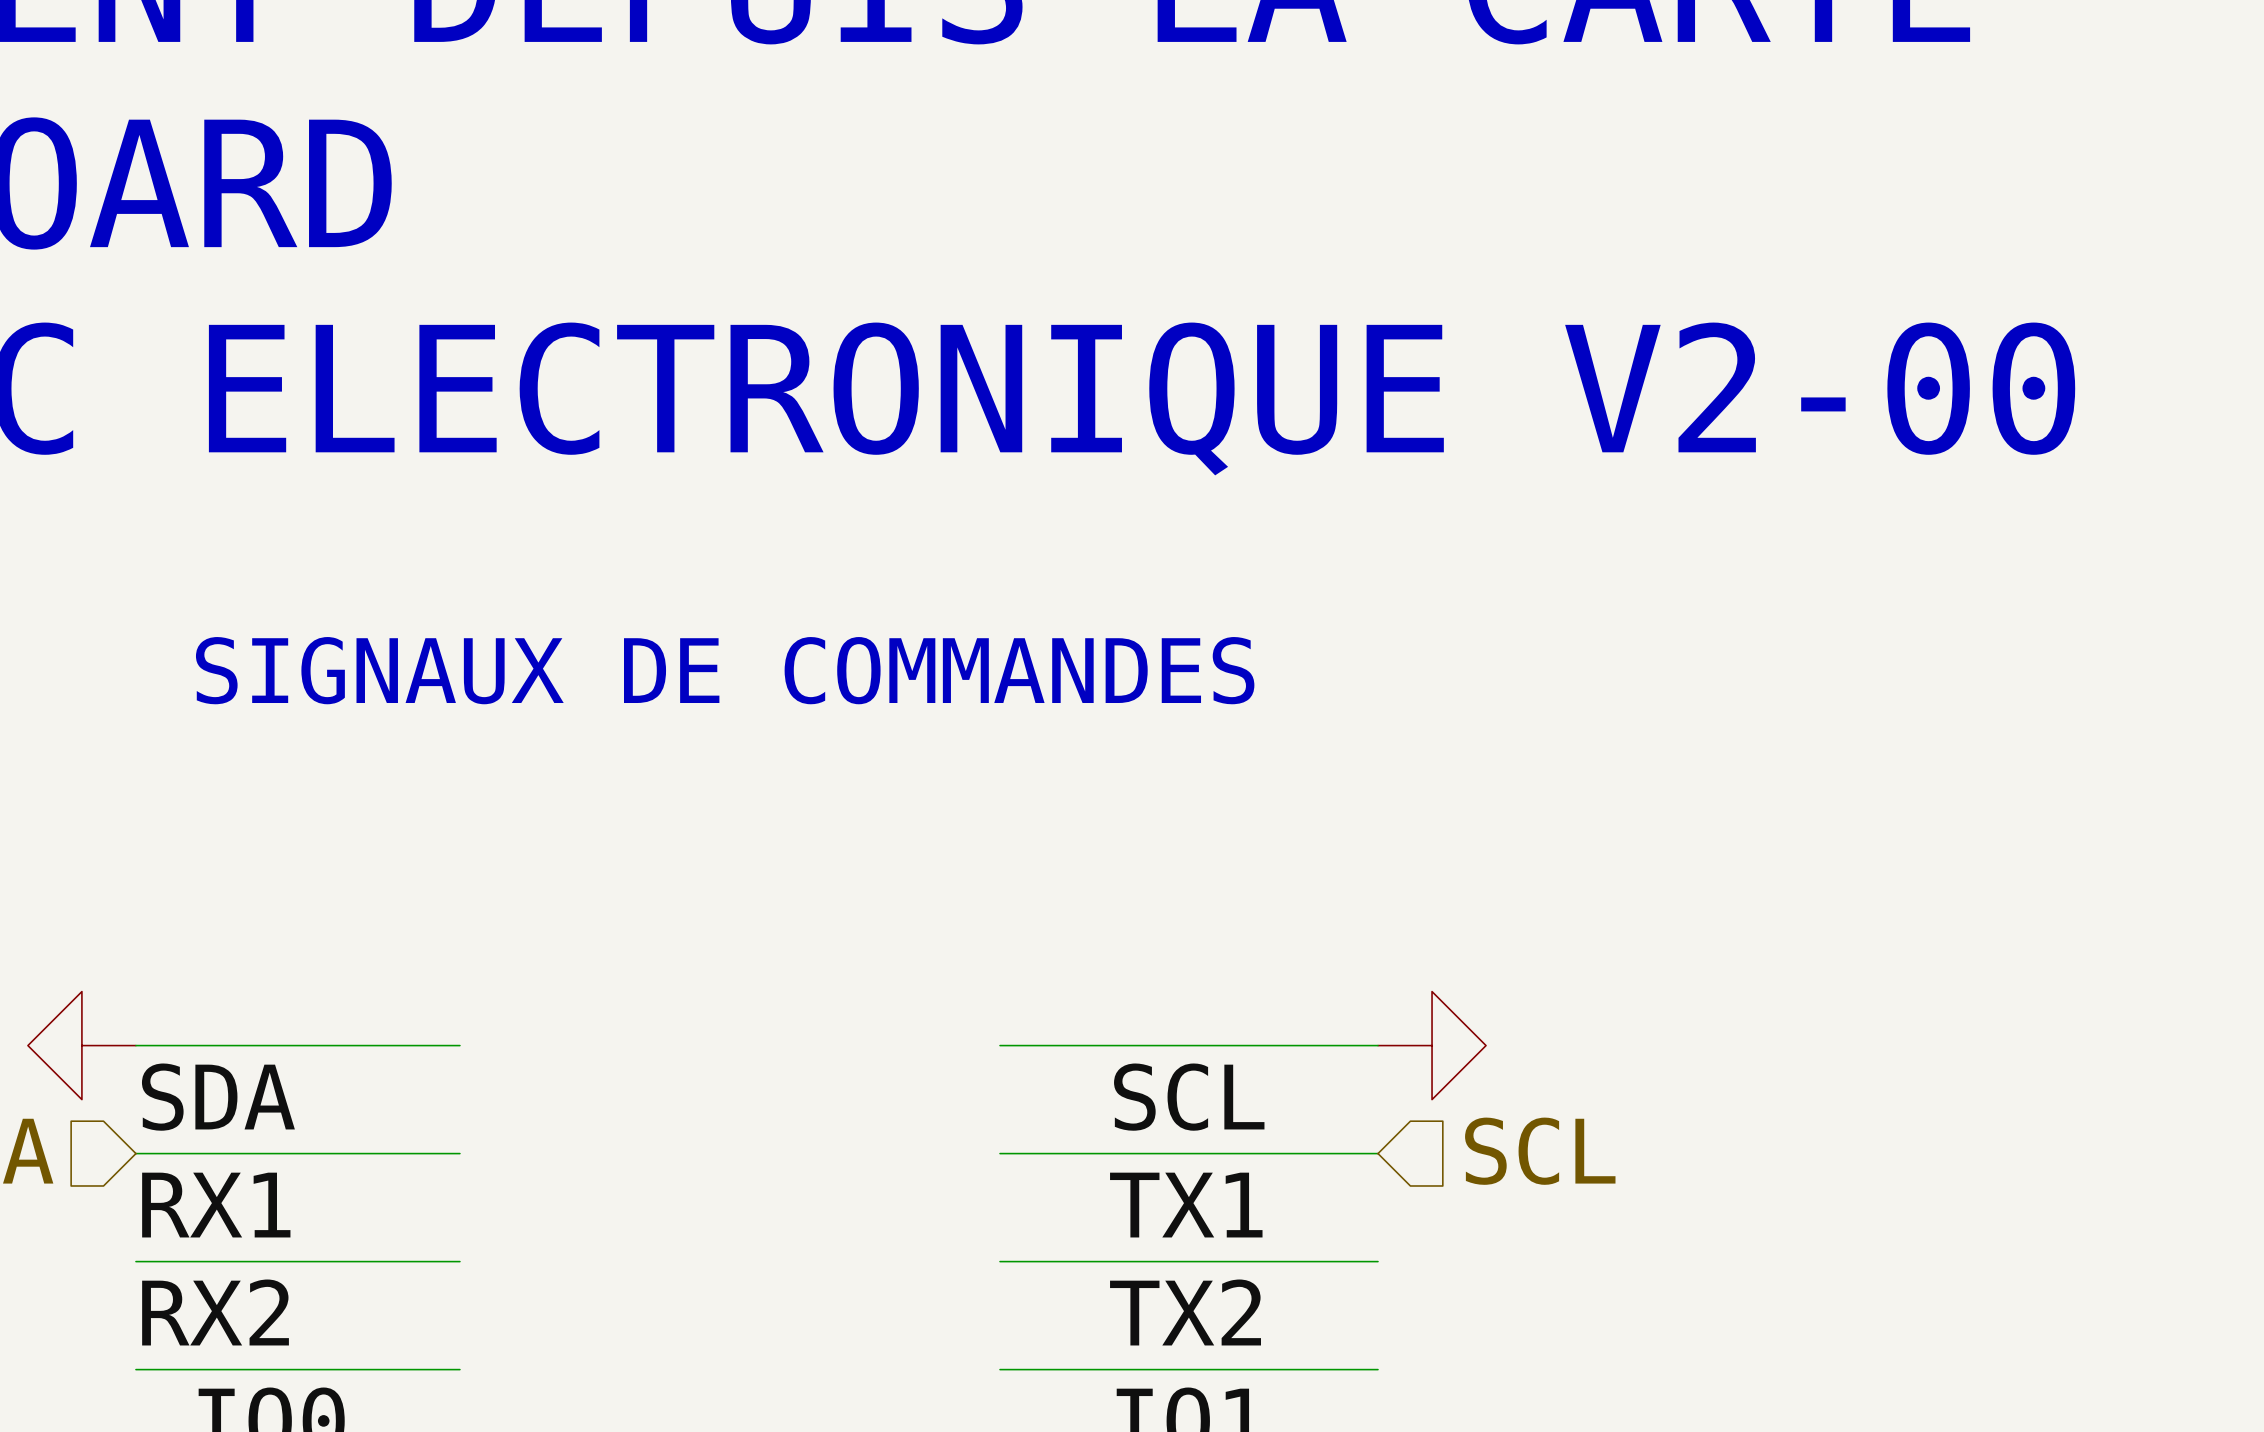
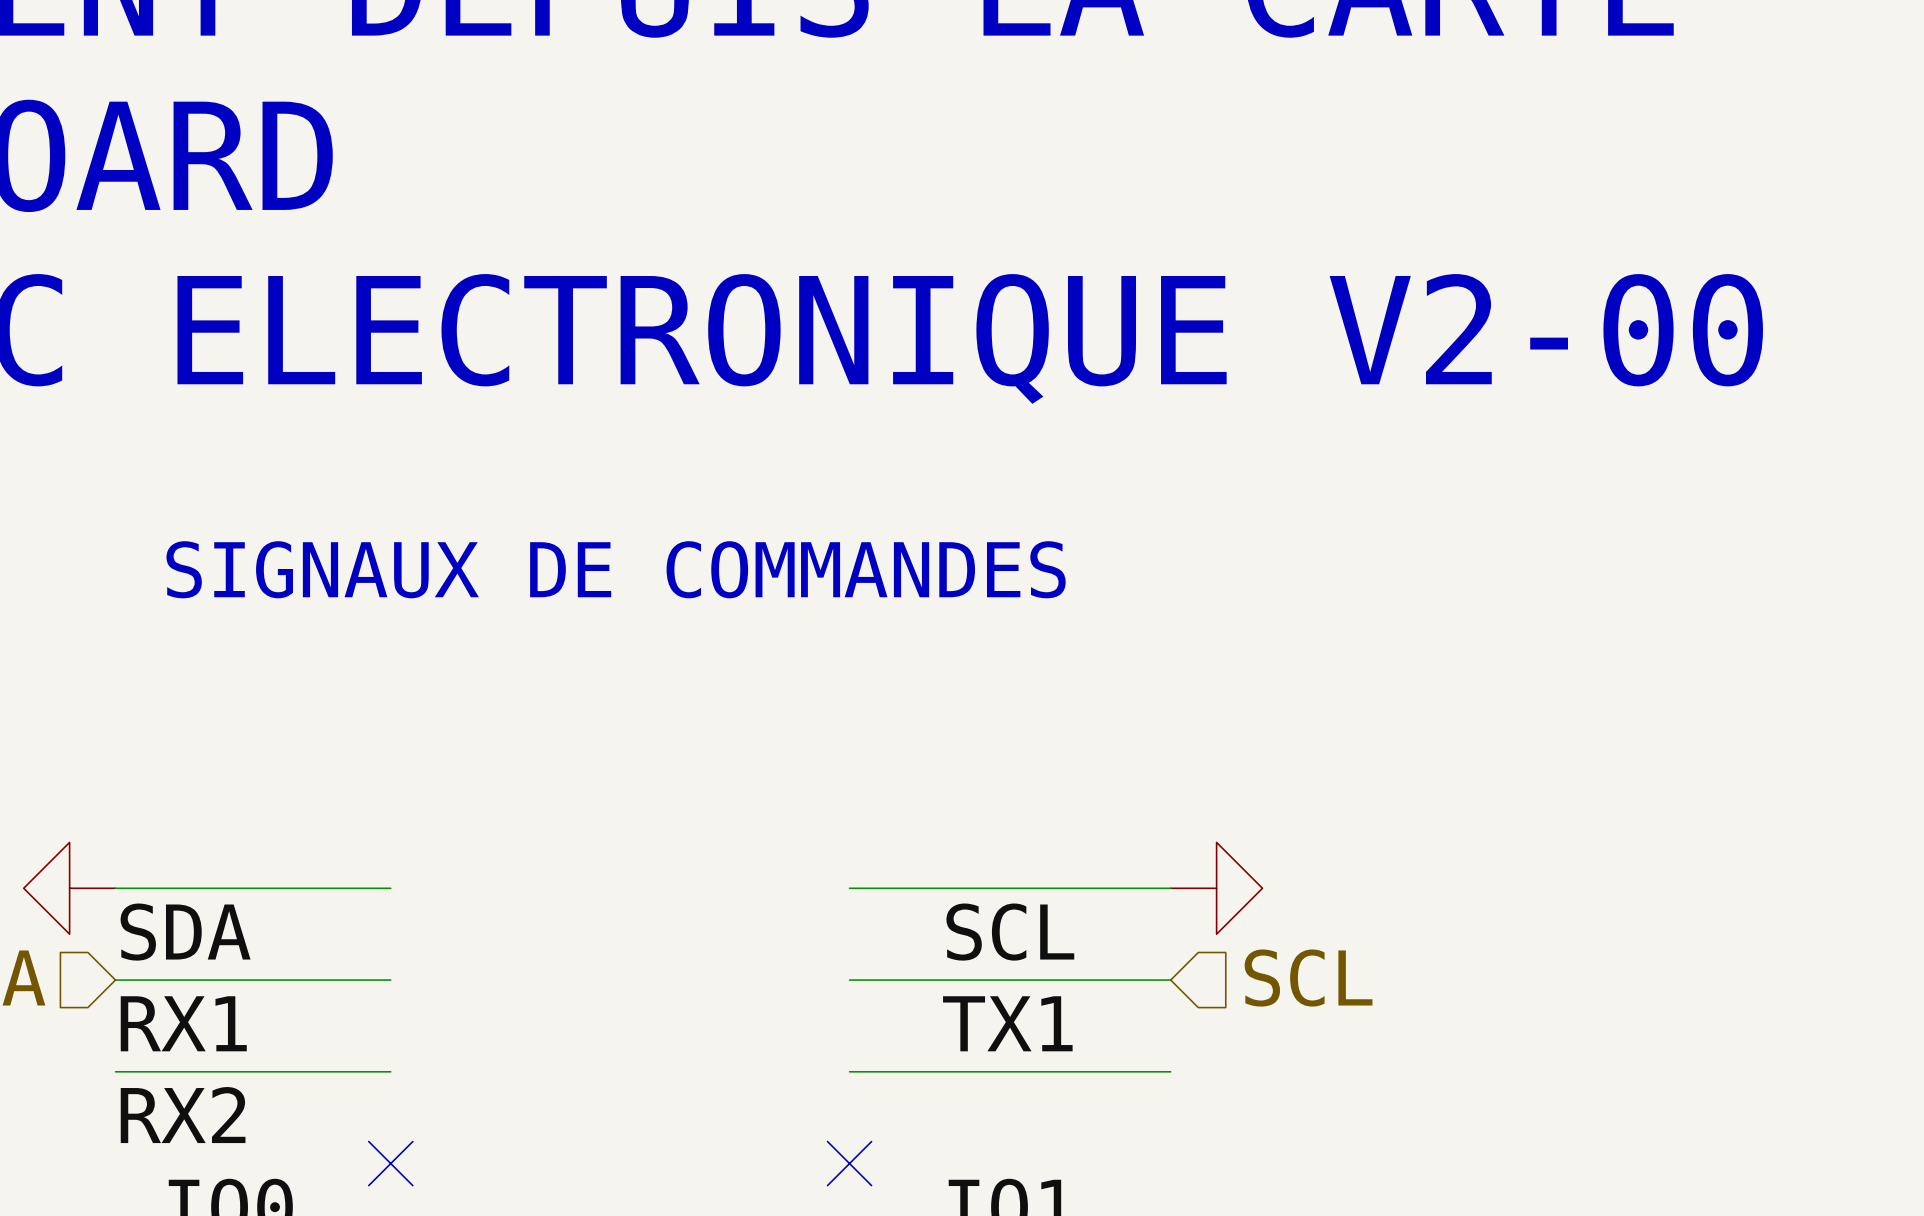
label: TX2 (1185, 1312) -> none
wire: (135, 1369) (459, 1369) -> none
no-connect mark: none -> (390, 1163)
wire: (999, 1369) (1378, 1369) -> none
no-connect mark: none -> (849, 1163)

